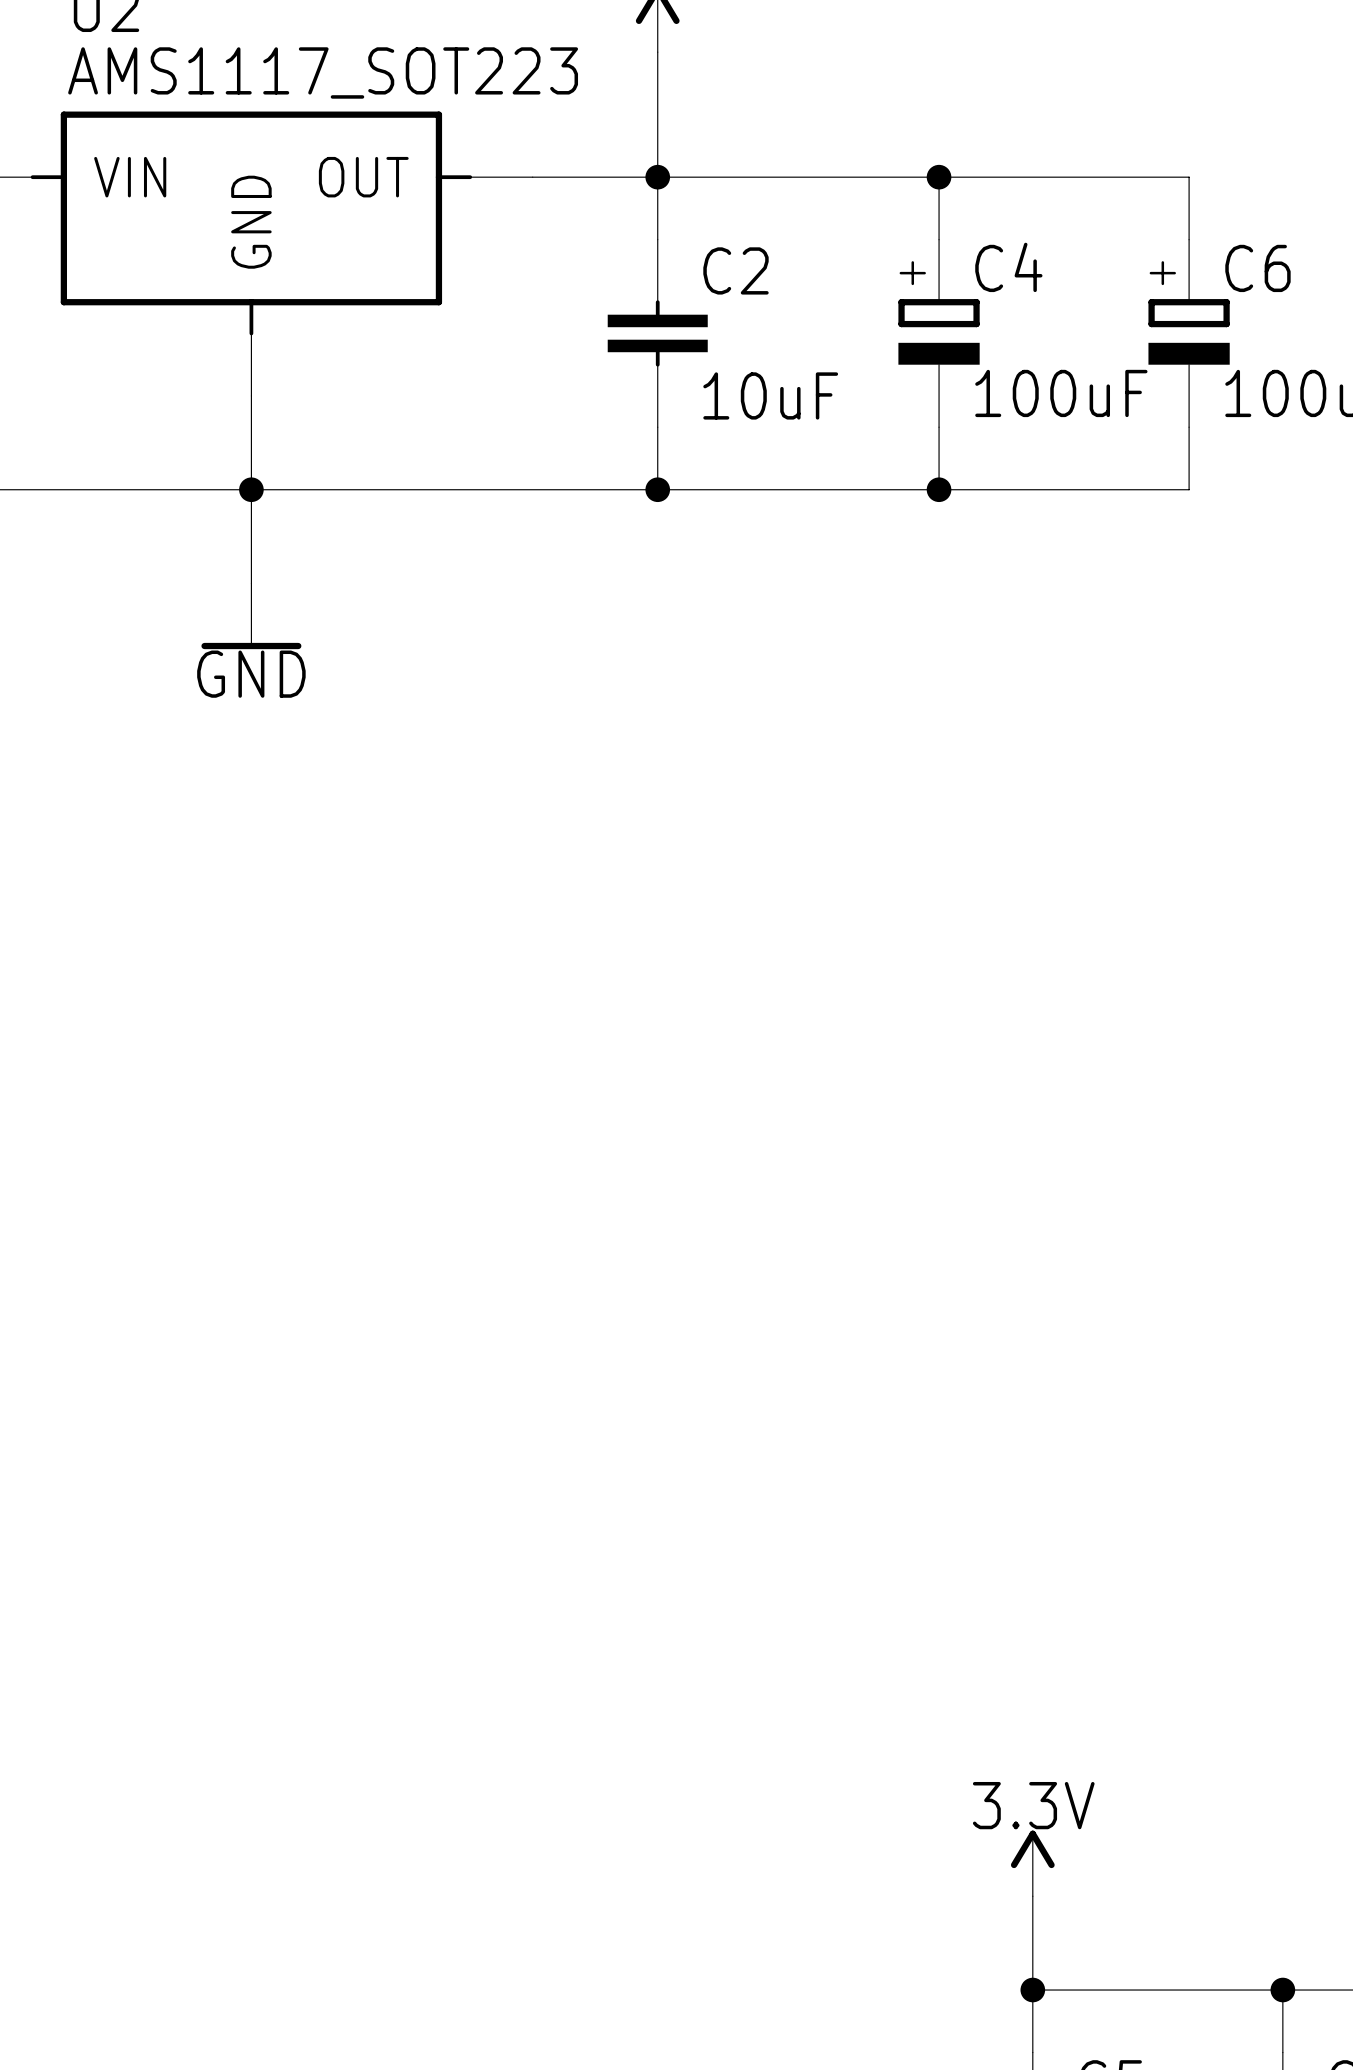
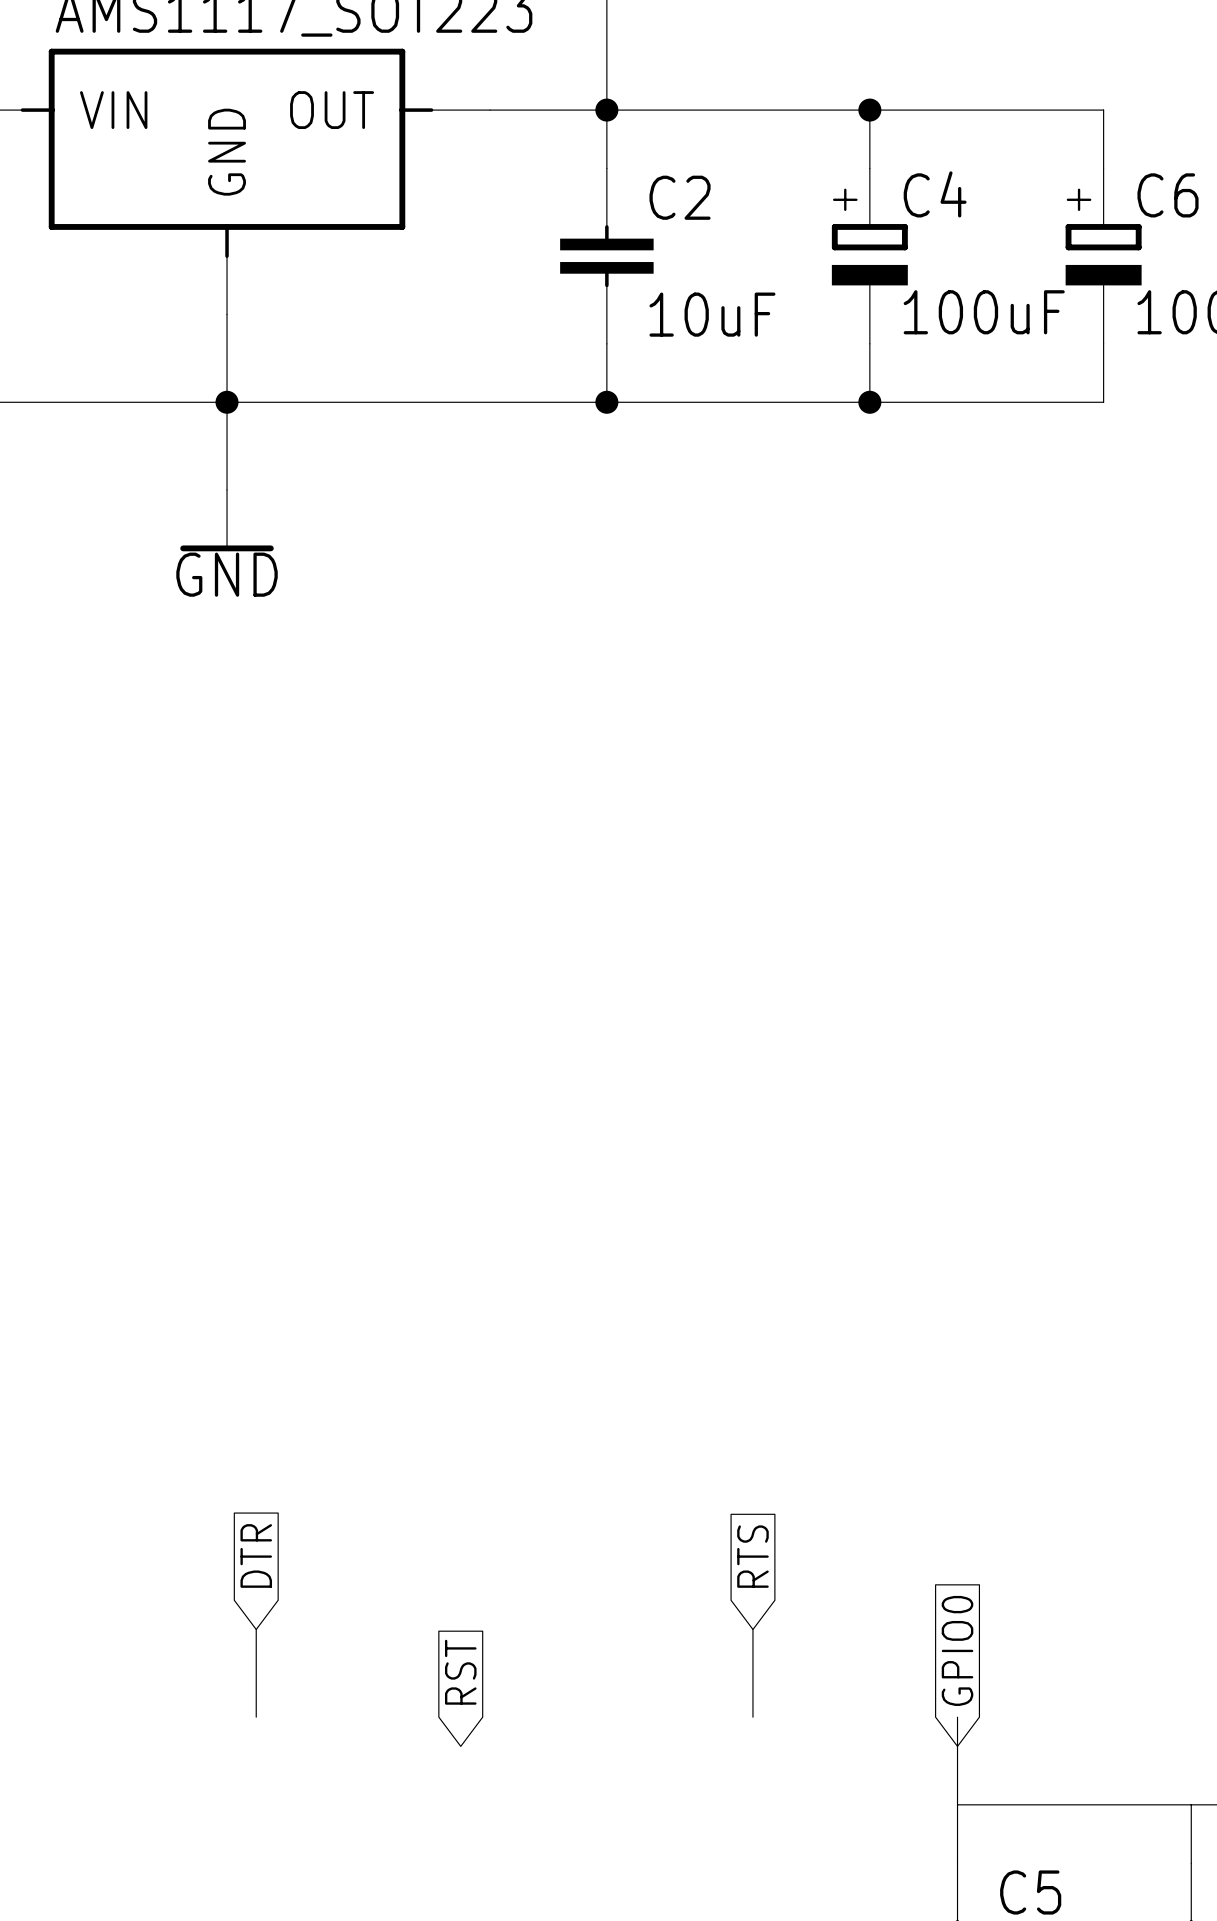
global label: none -> DTR (256, 1555)
global label: none -> RTS (752, 1556)
wire: none -> (256, 1629) (256, 1717)
wire: none -> (752, 1629) (752, 1717)
global label: none -> GPIO0 (957, 1650)
global label: none -> RST (460, 1672)
power symbol: 3.3V (1032, 1863) -> none
junction: (1032, 1990) -> none
junction: (1282, 1990) -> none

